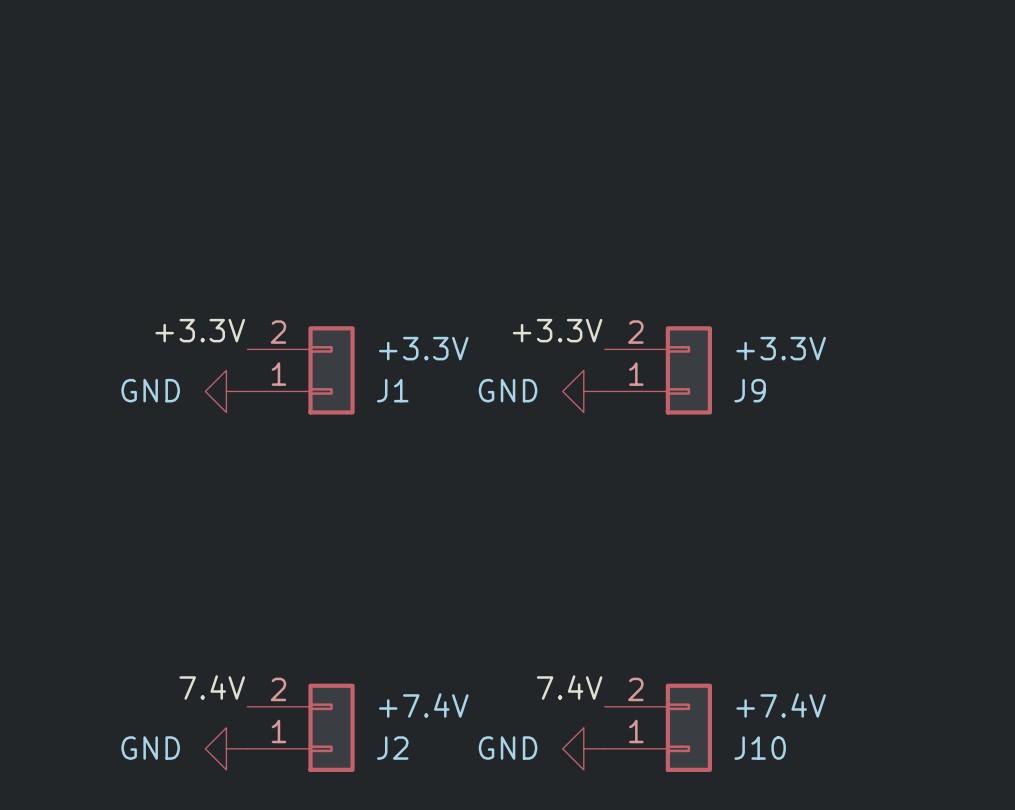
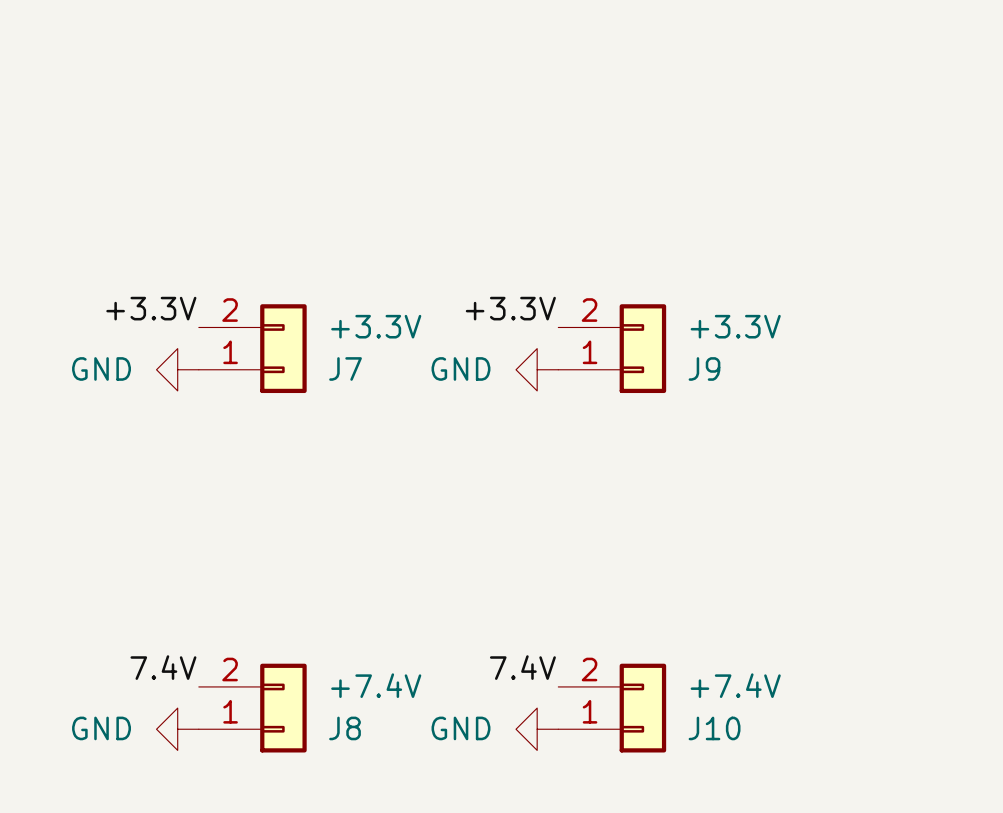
J1 name: J1 (392, 390) -> J7 (345, 368)
J2 name: J2 (392, 748) -> J8 (345, 728)

